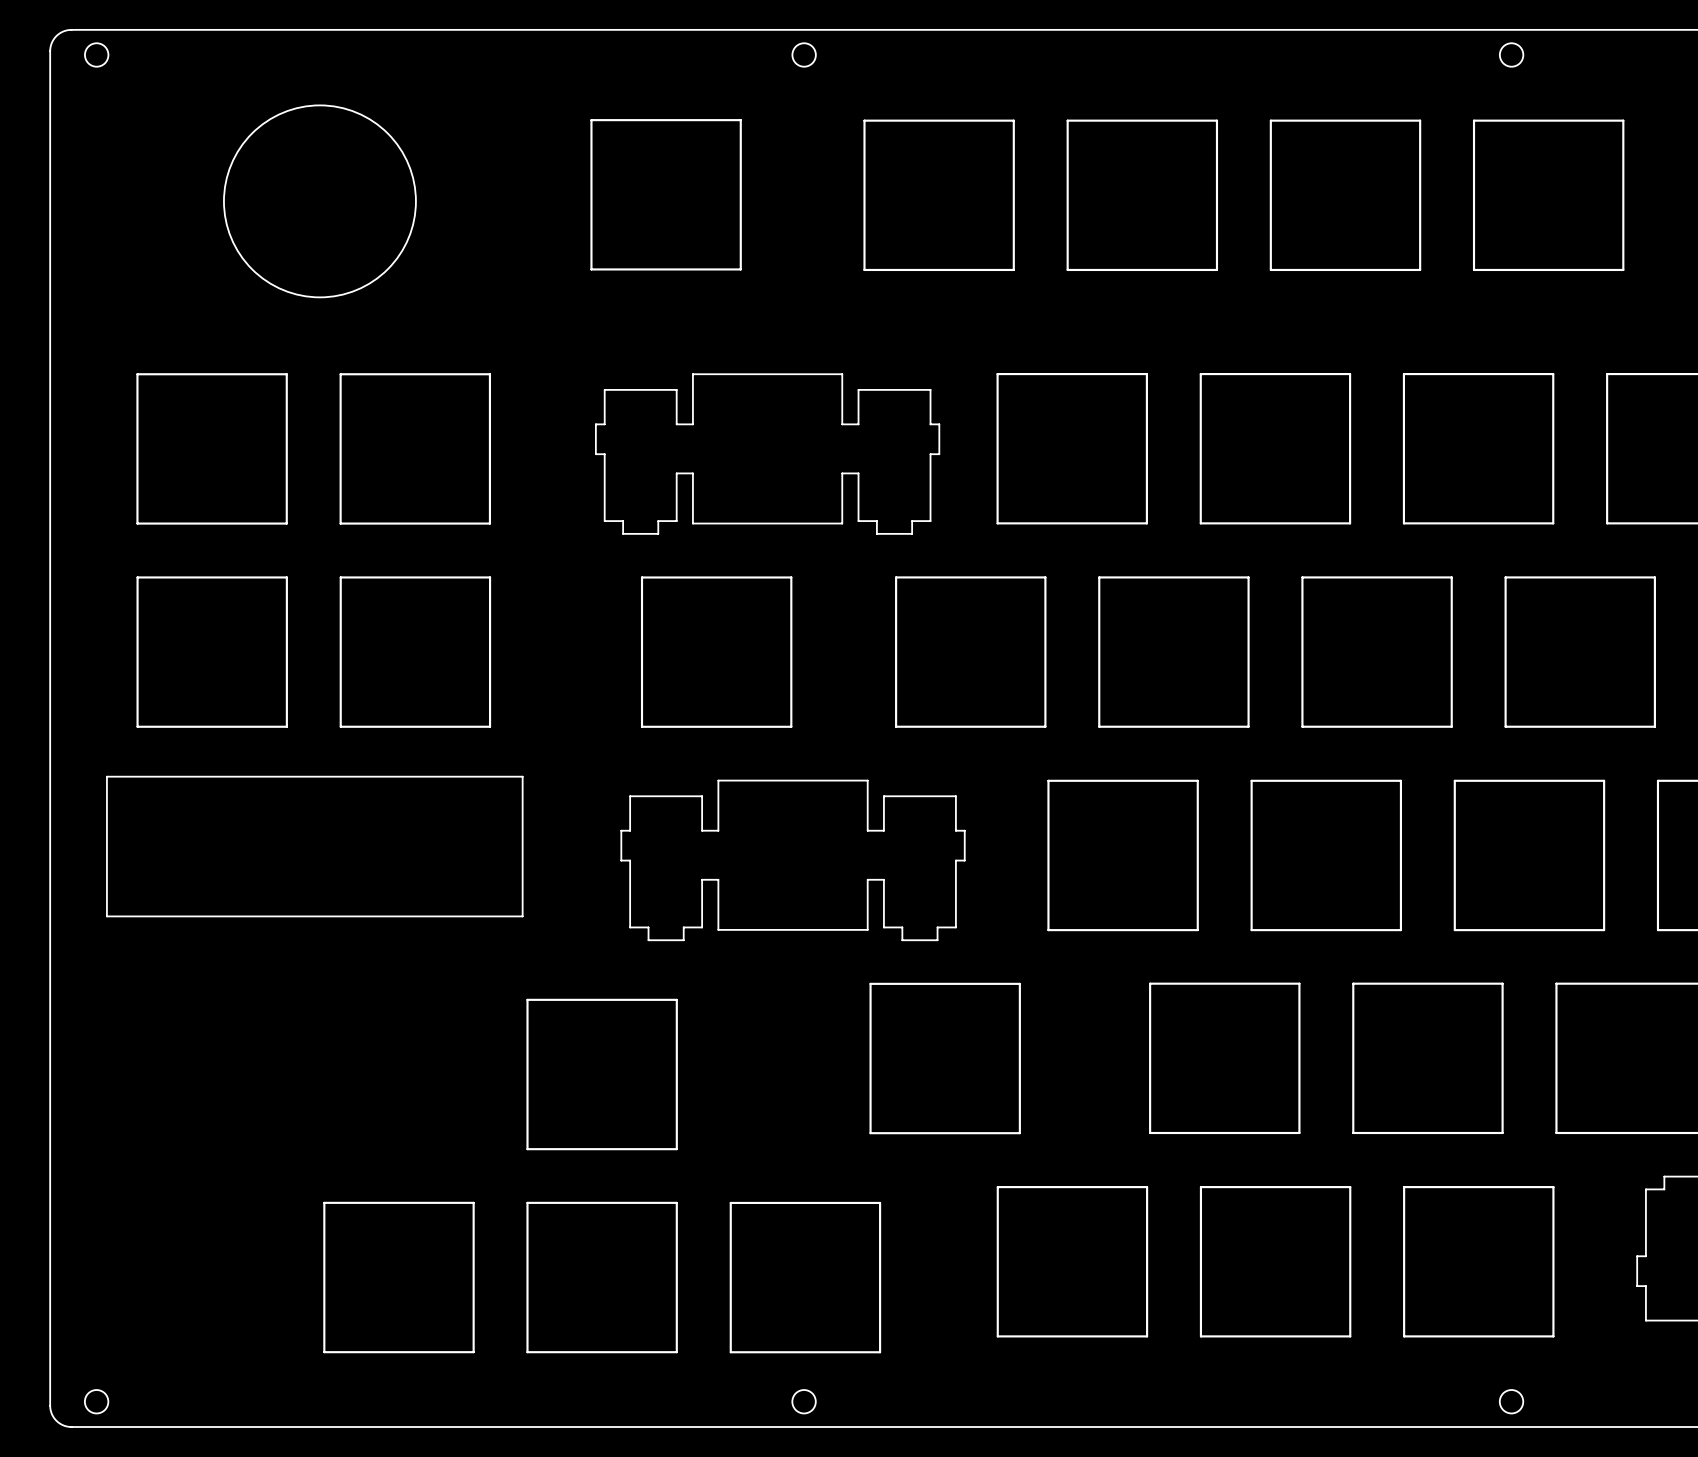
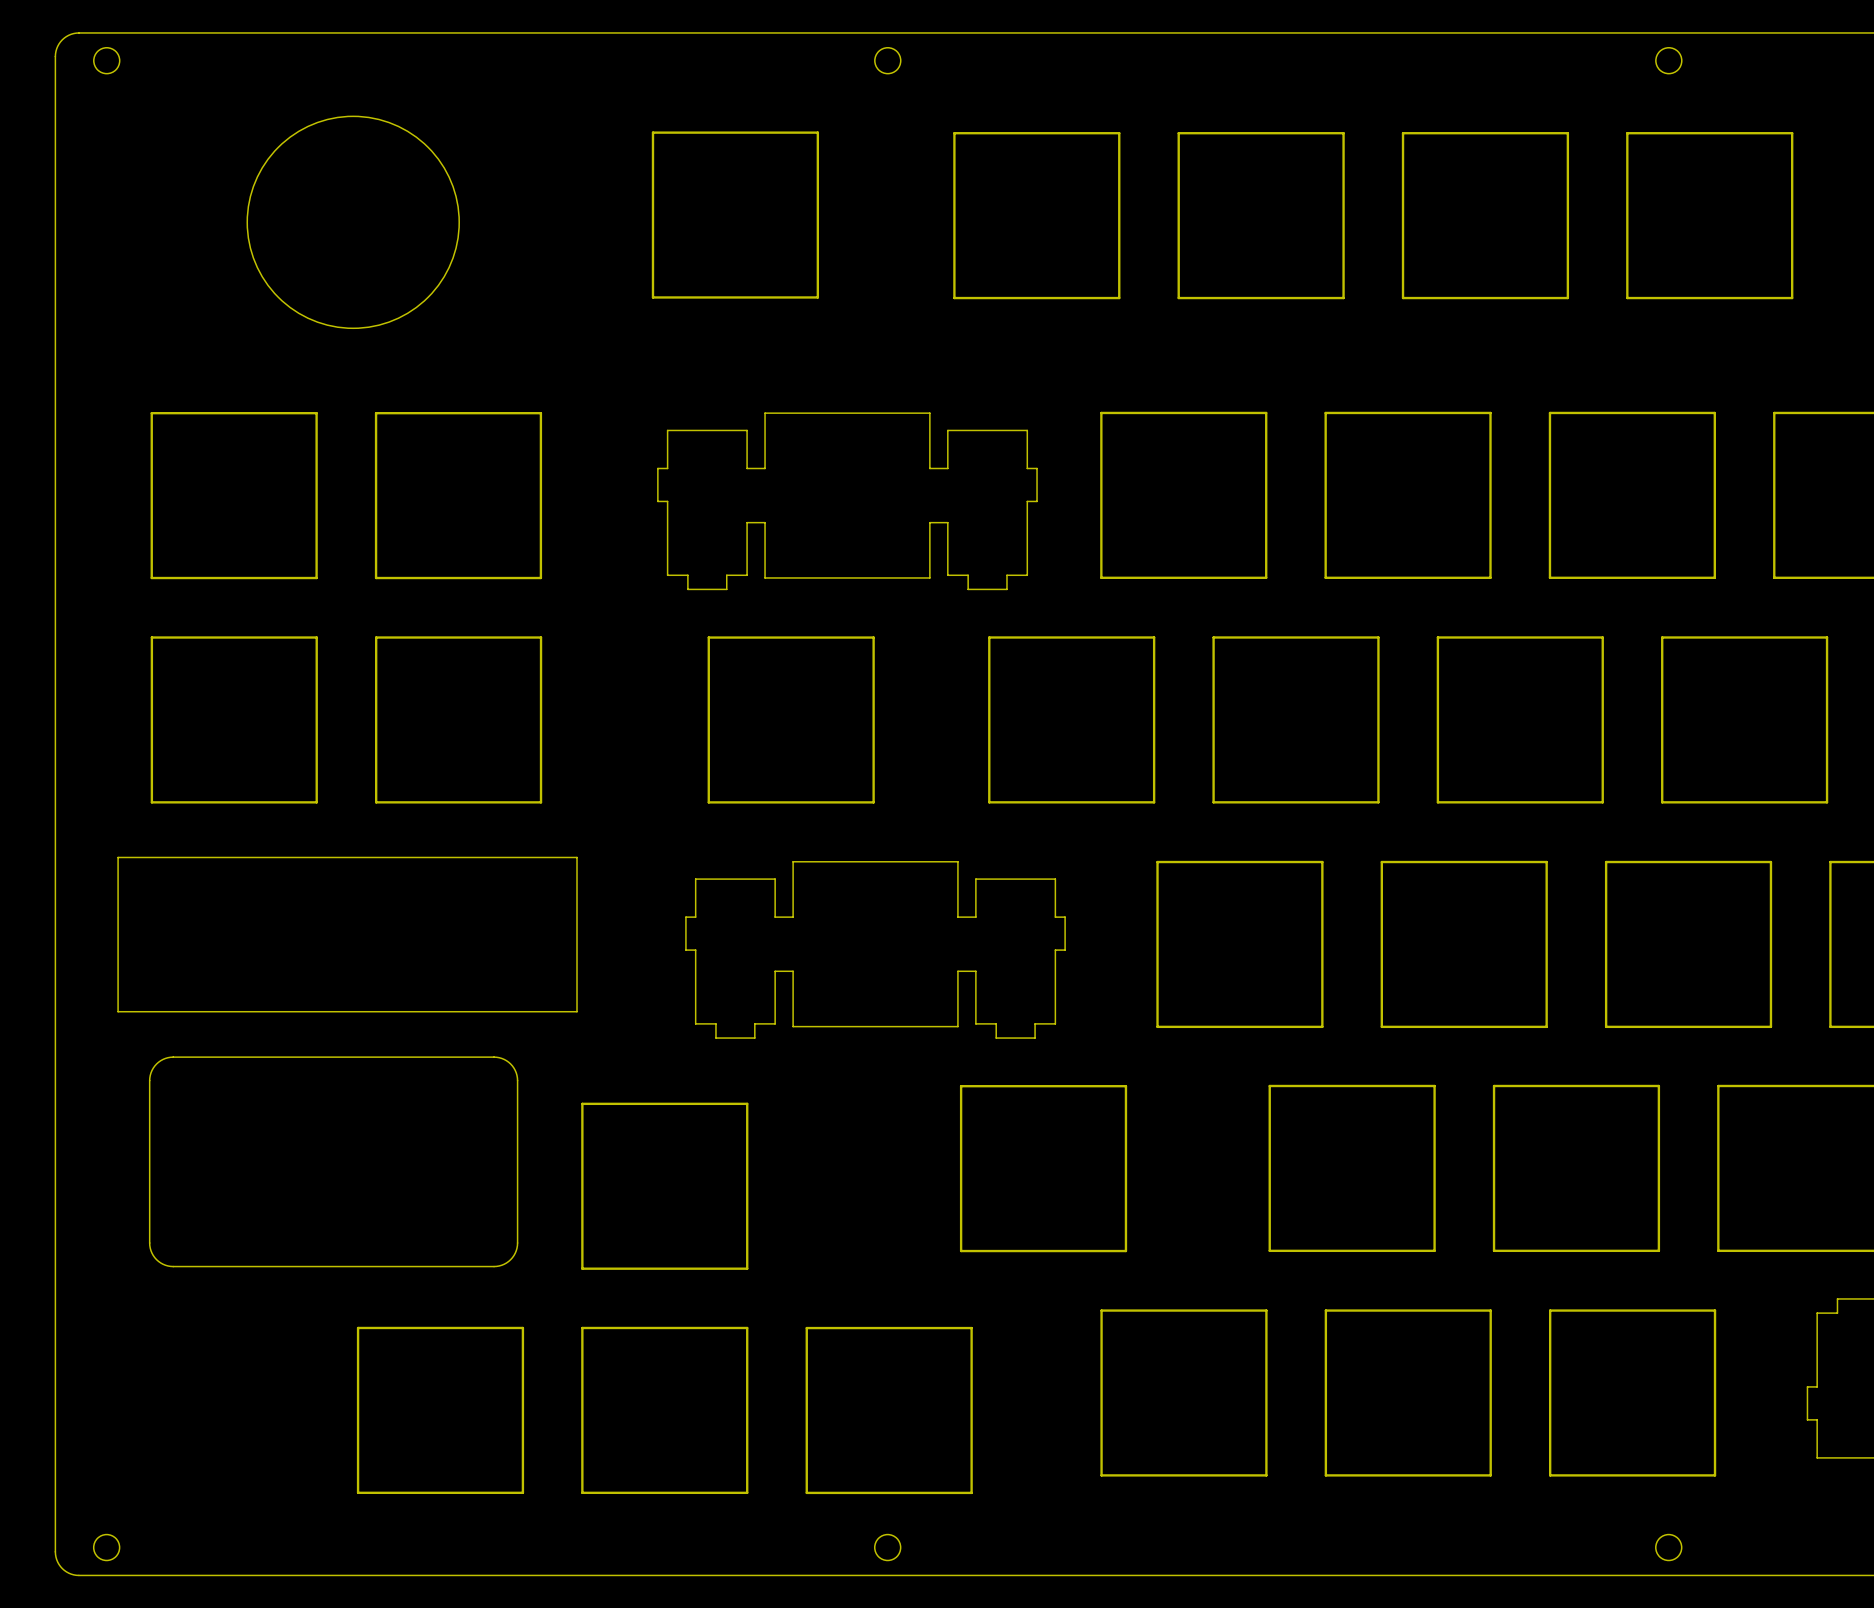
board edge: none -> (494, 1057) (173, 1057) (160, 1060) (152, 1070) (149, 1080) (149, 1243) (153, 1255) (163, 1264) (173, 1266) (494, 1266) (506, 1262) (513, 1255) (517, 1245) (517, 1078) (510, 1064) (504, 1059) (494, 1057)

